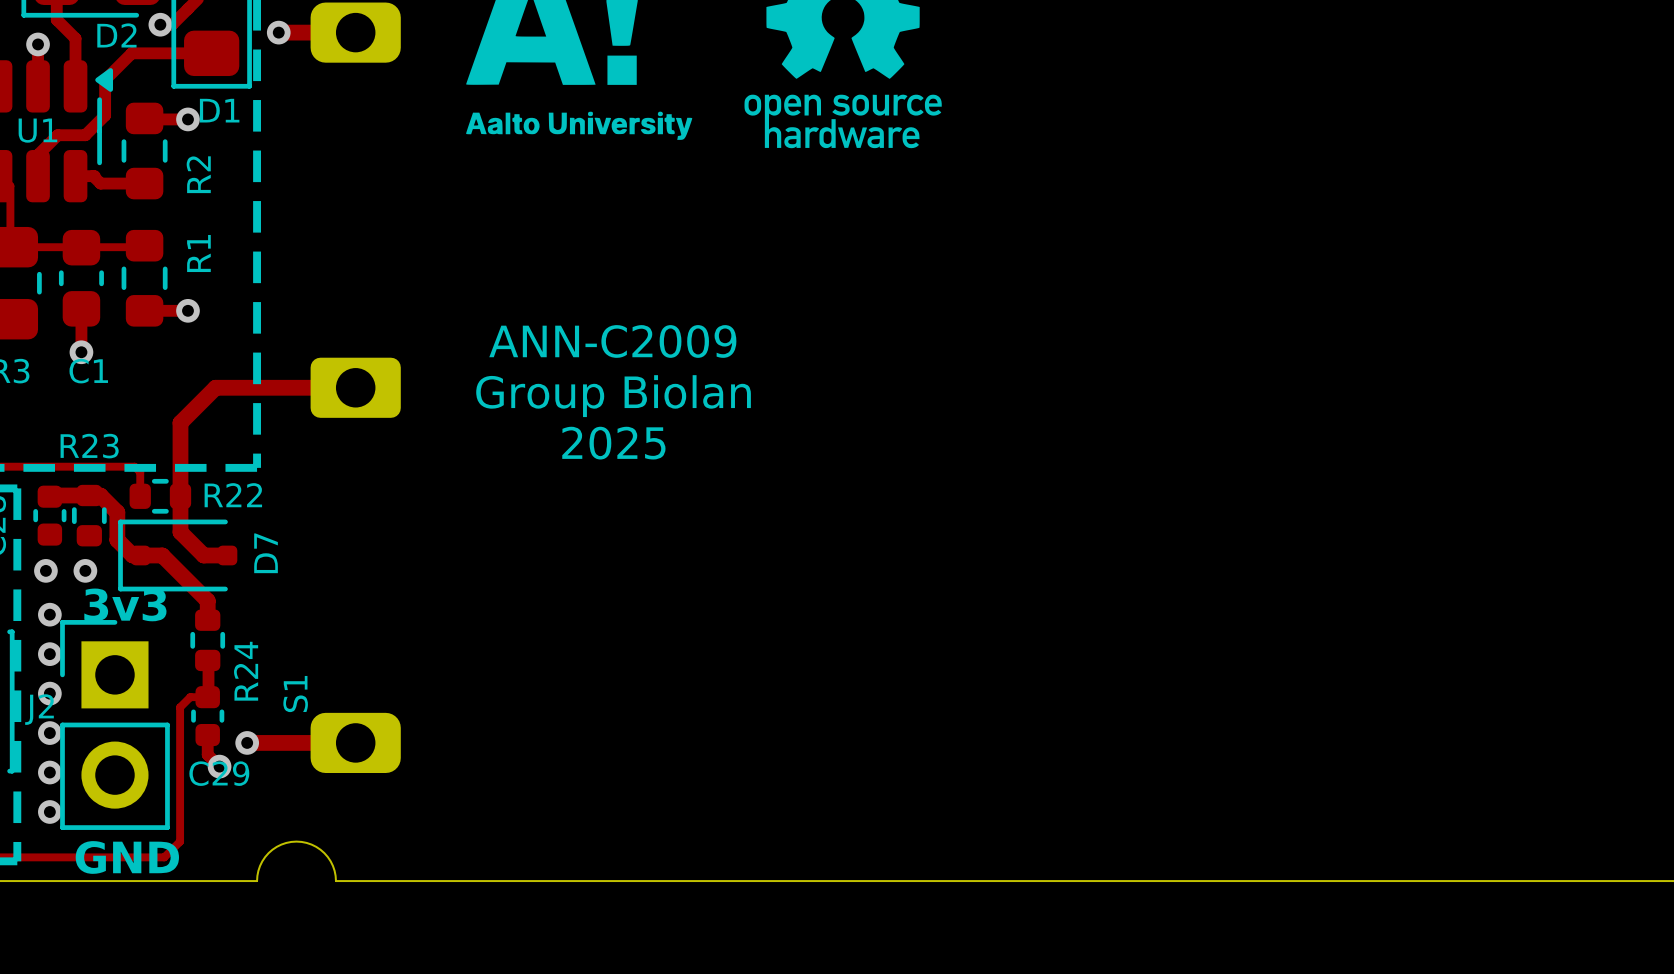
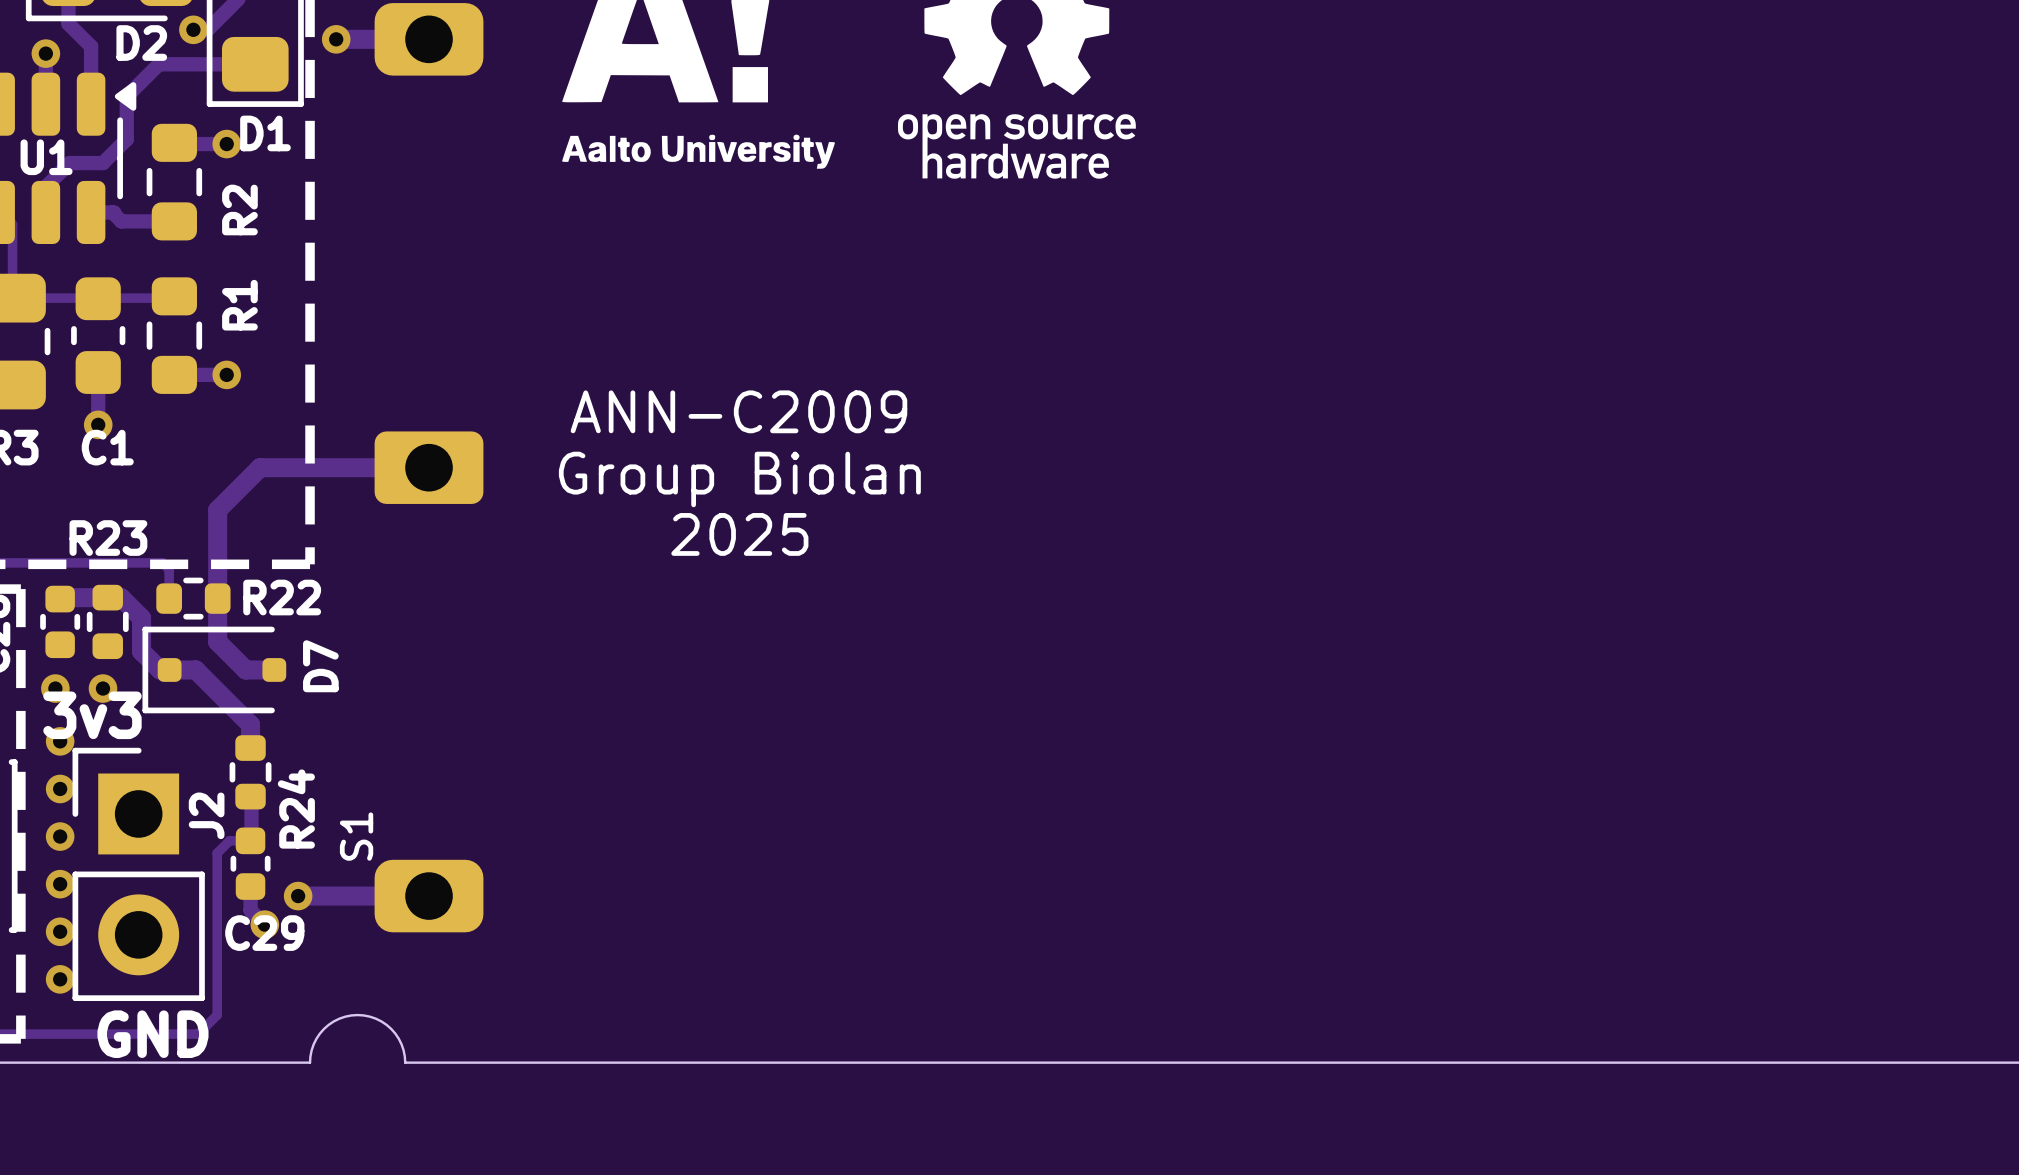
text position: 3v3 (125, 604) -> 3v3 (92, 715)
J2 name rotation: 0° (39, 709) -> 90° counterclockwise (206, 815)
J2 name position: J2 (39, 709) -> J2 (206, 815)

